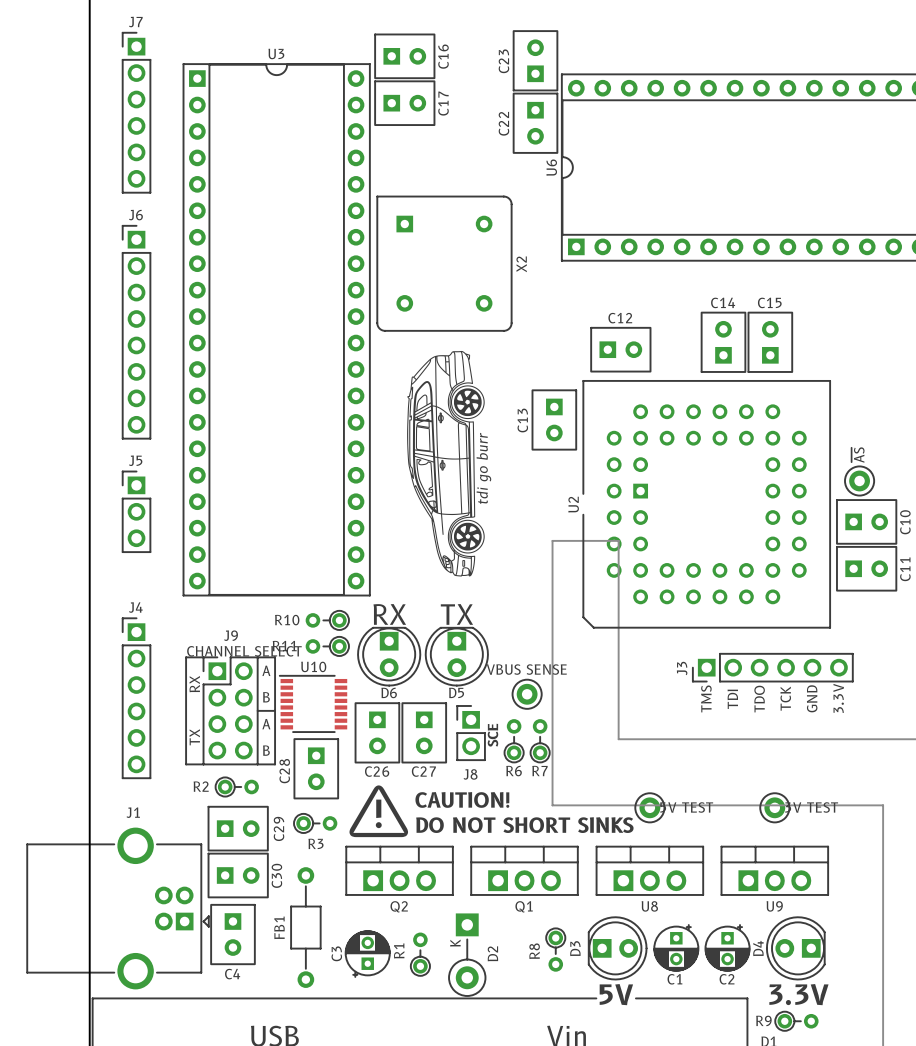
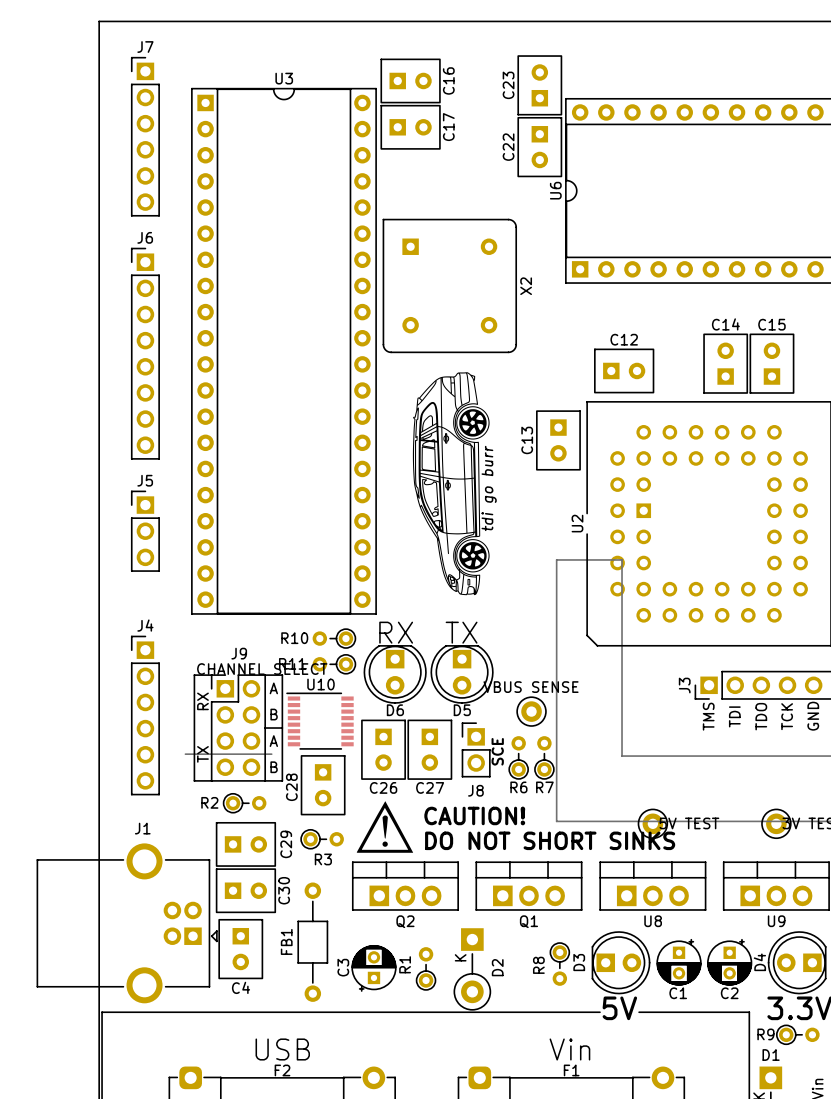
line: none -> (185, 754) (271, 754)

